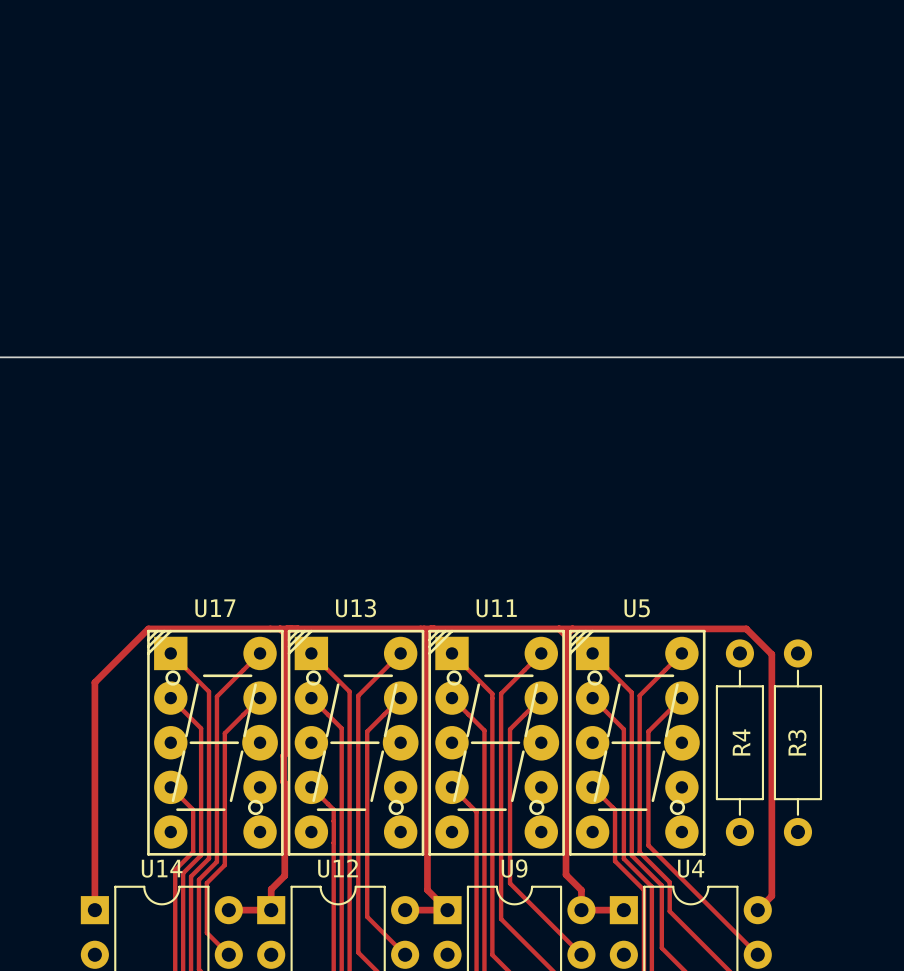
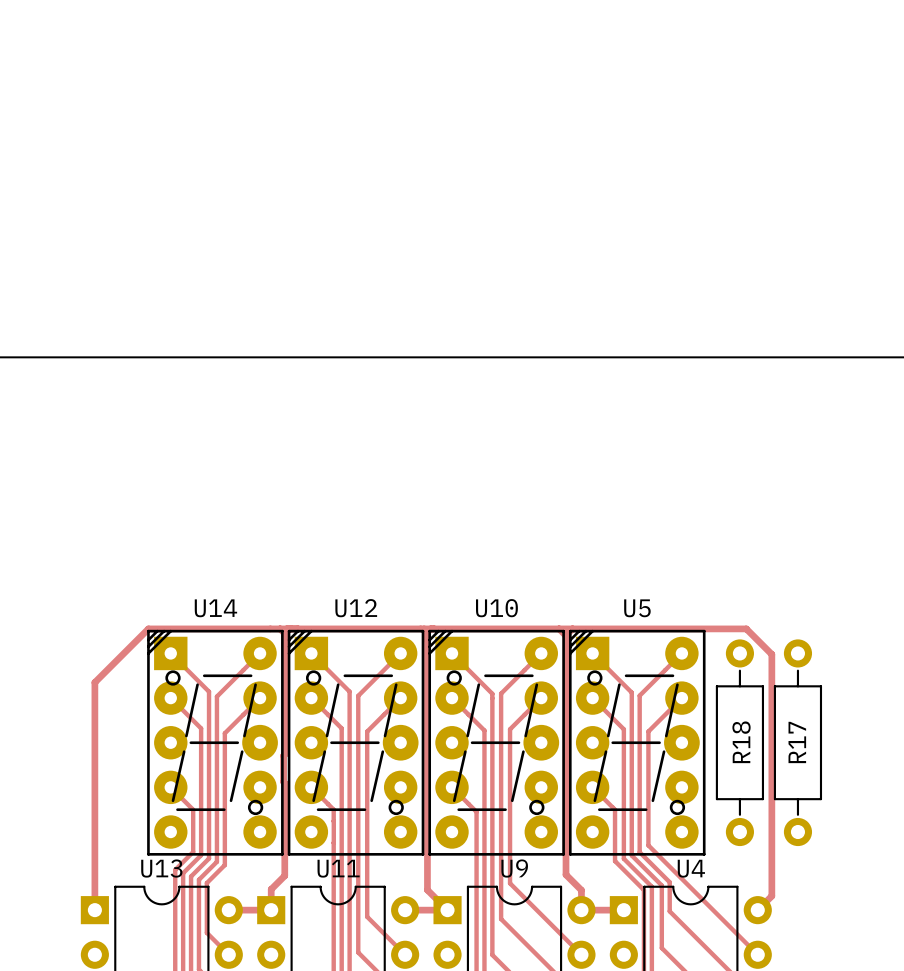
U17 name: U17 (215, 608) -> U14 (215, 608)
U13 name: U13 (355, 608) -> U12 (356, 608)
U11 name: U11 (496, 608) -> U10 (496, 608)
R4 name: R4 (741, 742) -> R18 (741, 742)
R3 name: R3 (797, 742) -> R17 (797, 742)
U14 name: U14 (162, 868) -> U13 (161, 868)
U12 name: U12 (338, 868) -> U11 (338, 868)

